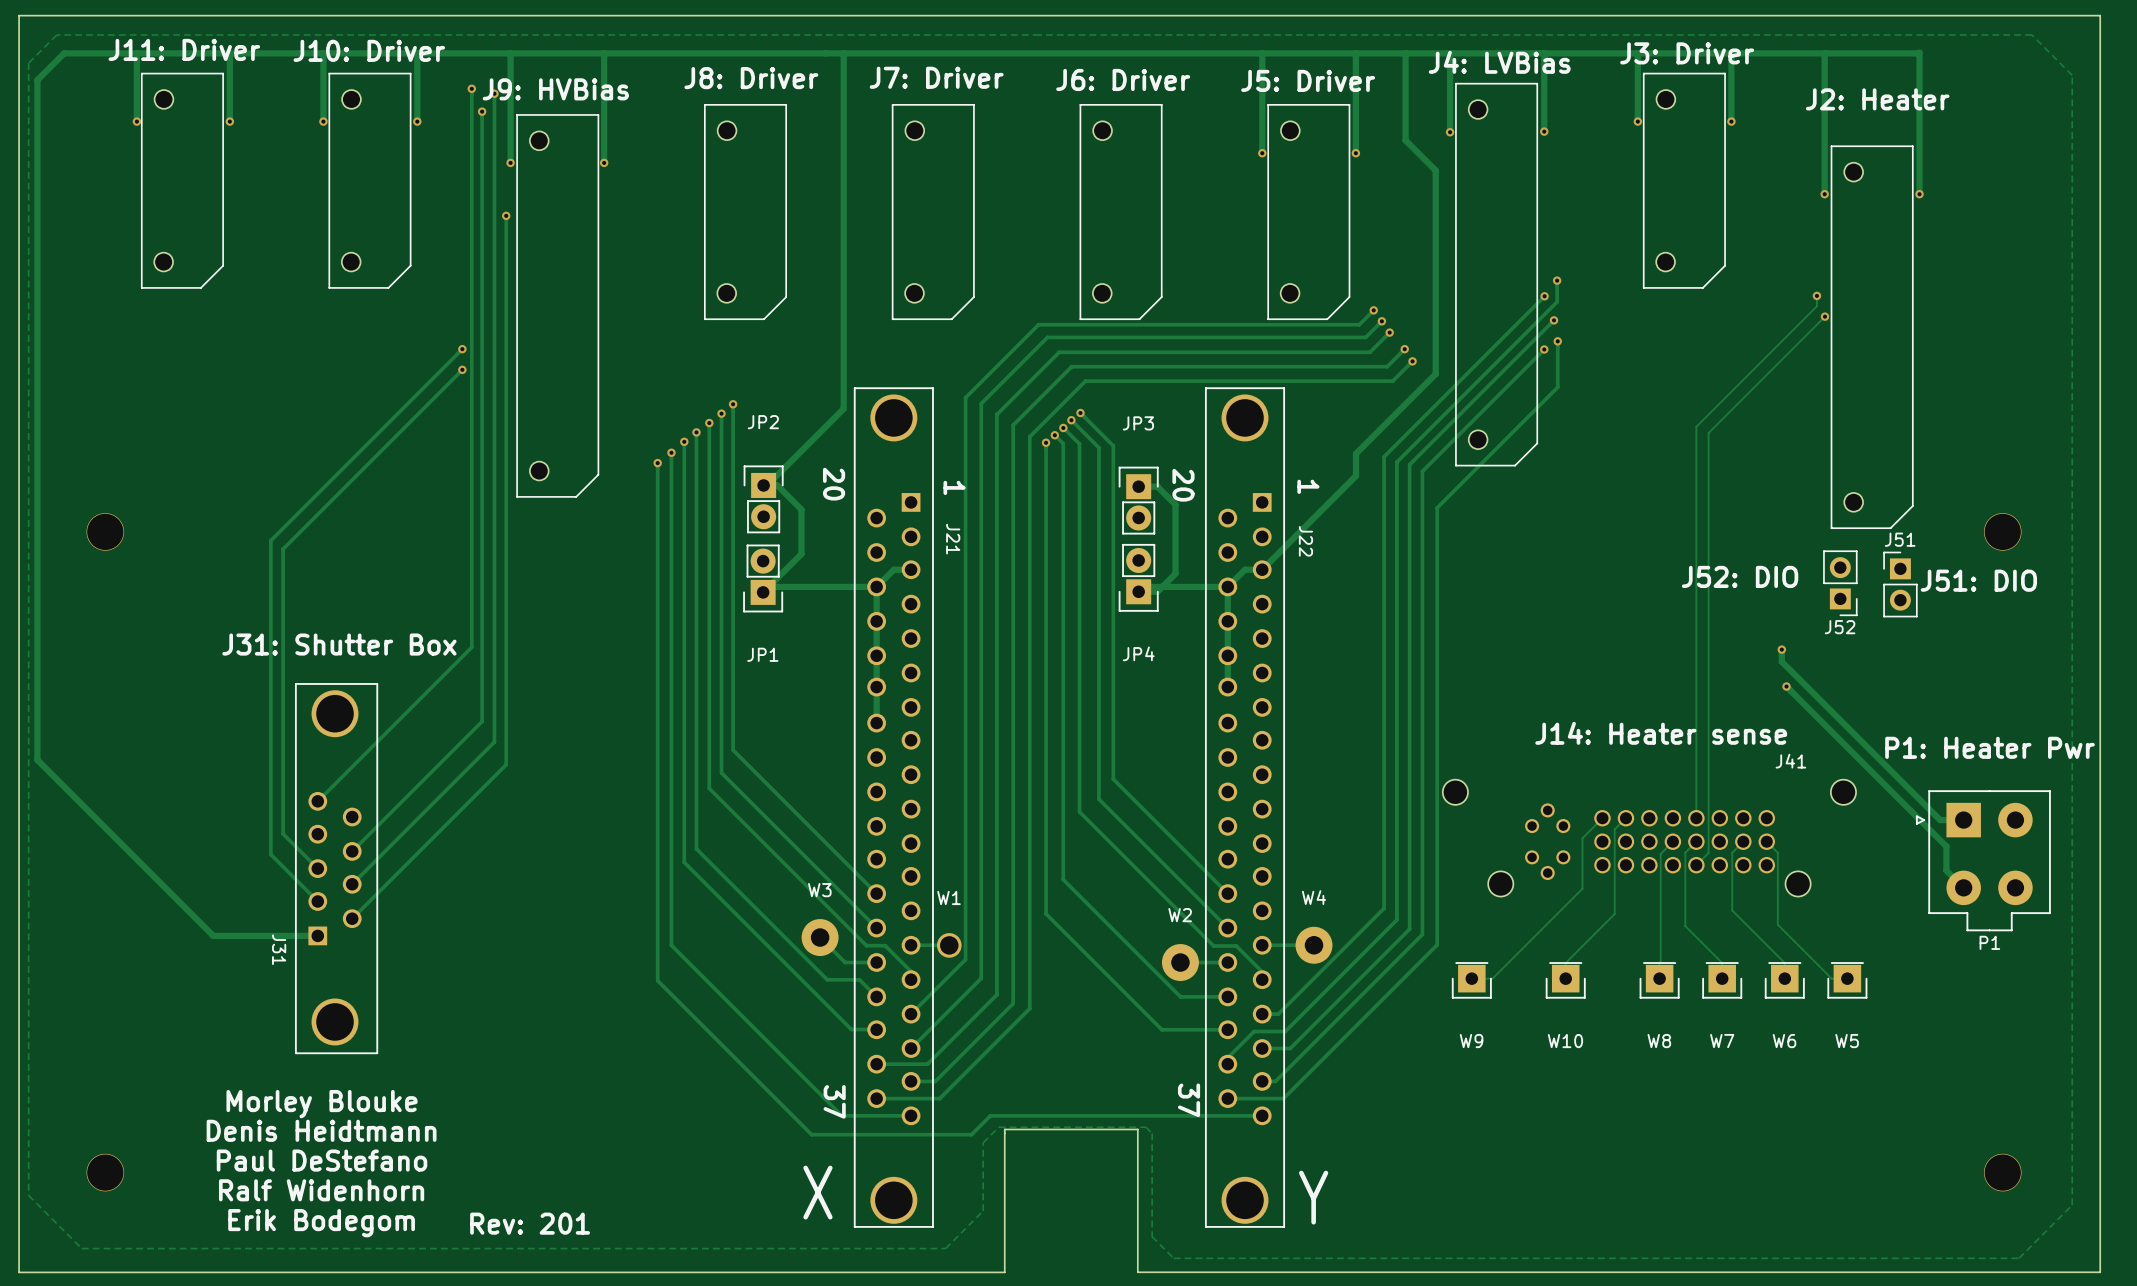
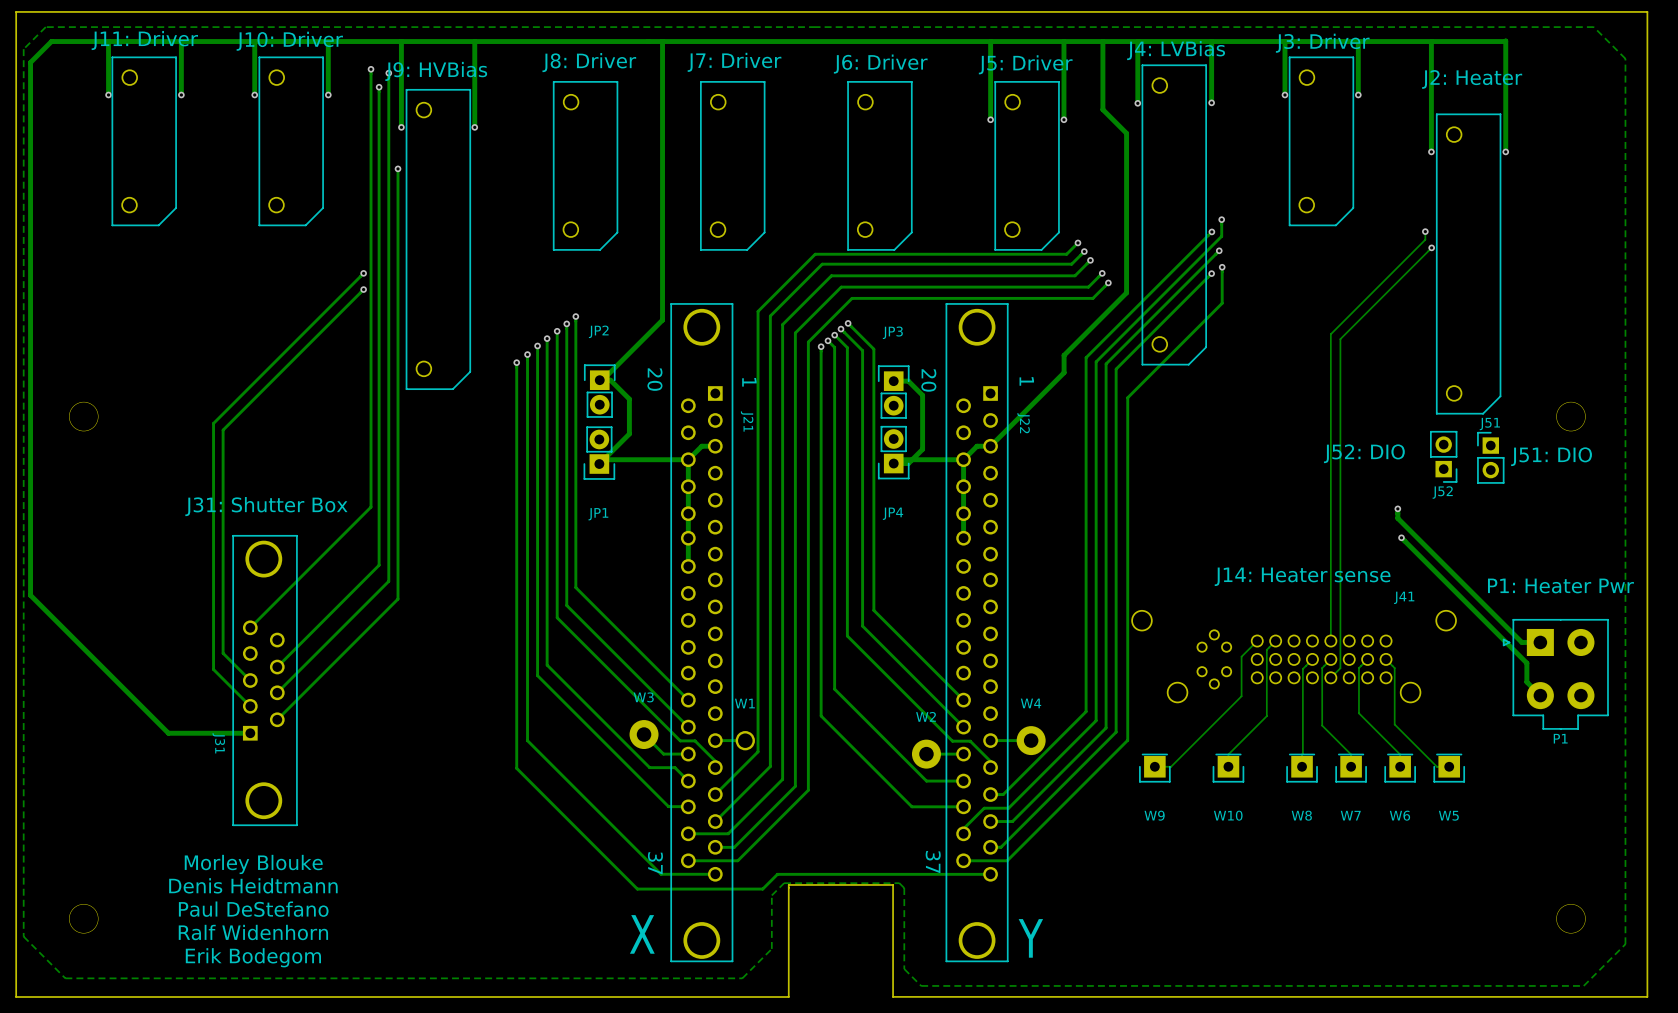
text: Rev: 201 (530, 1223) -> none

